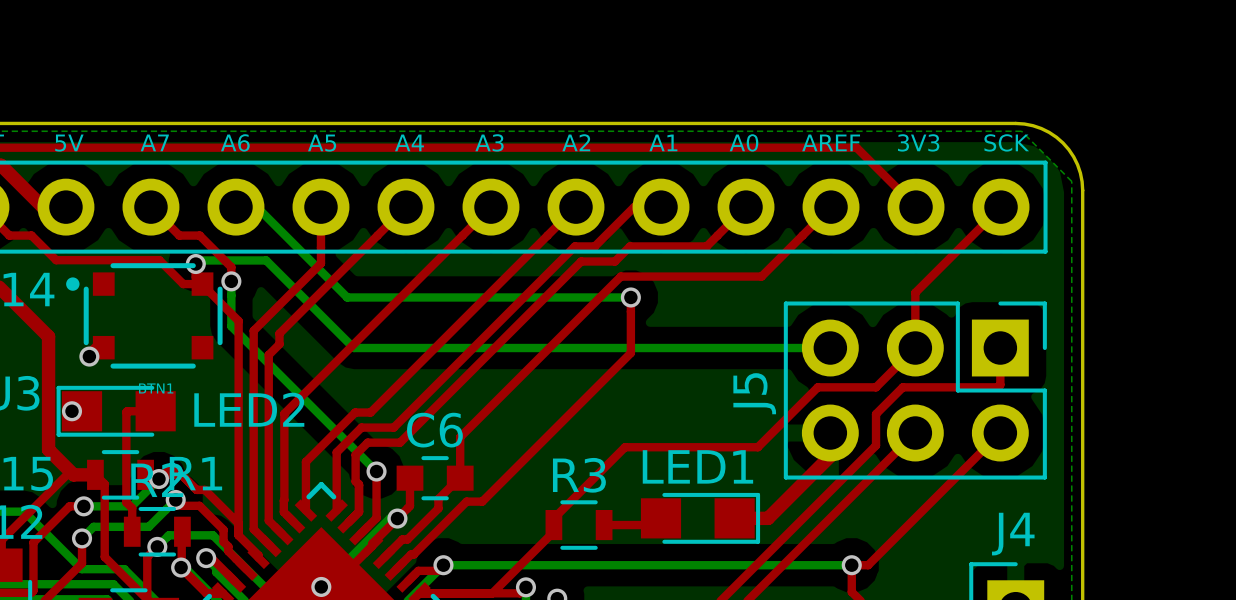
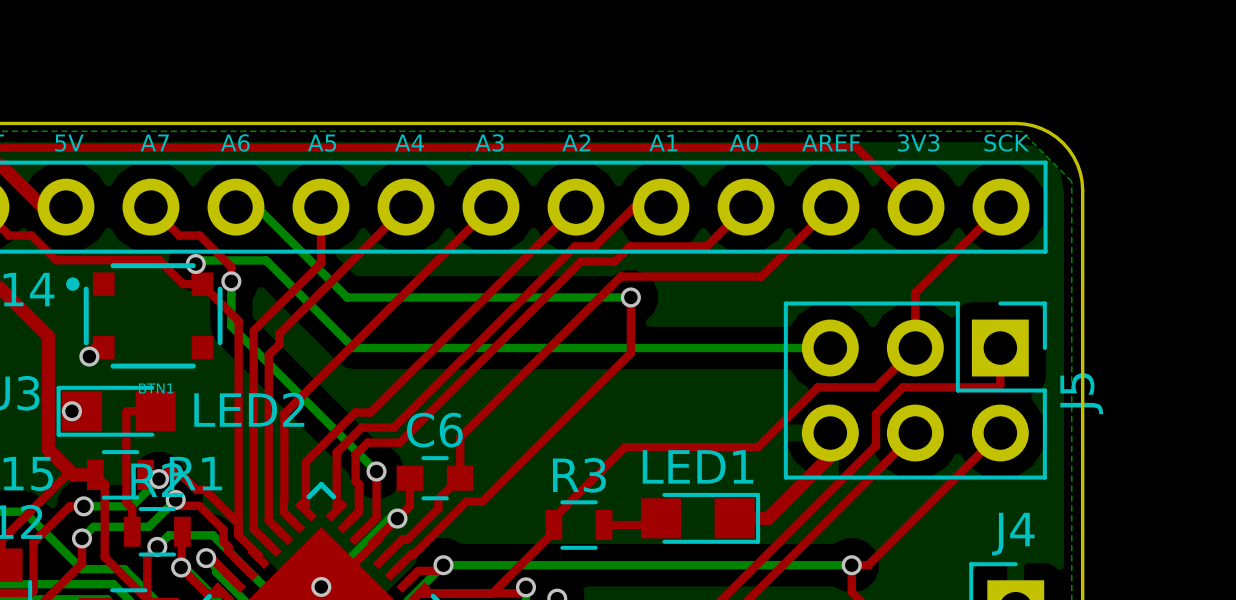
J5 name position: J5 (754, 393) -> J5 (1081, 393)

